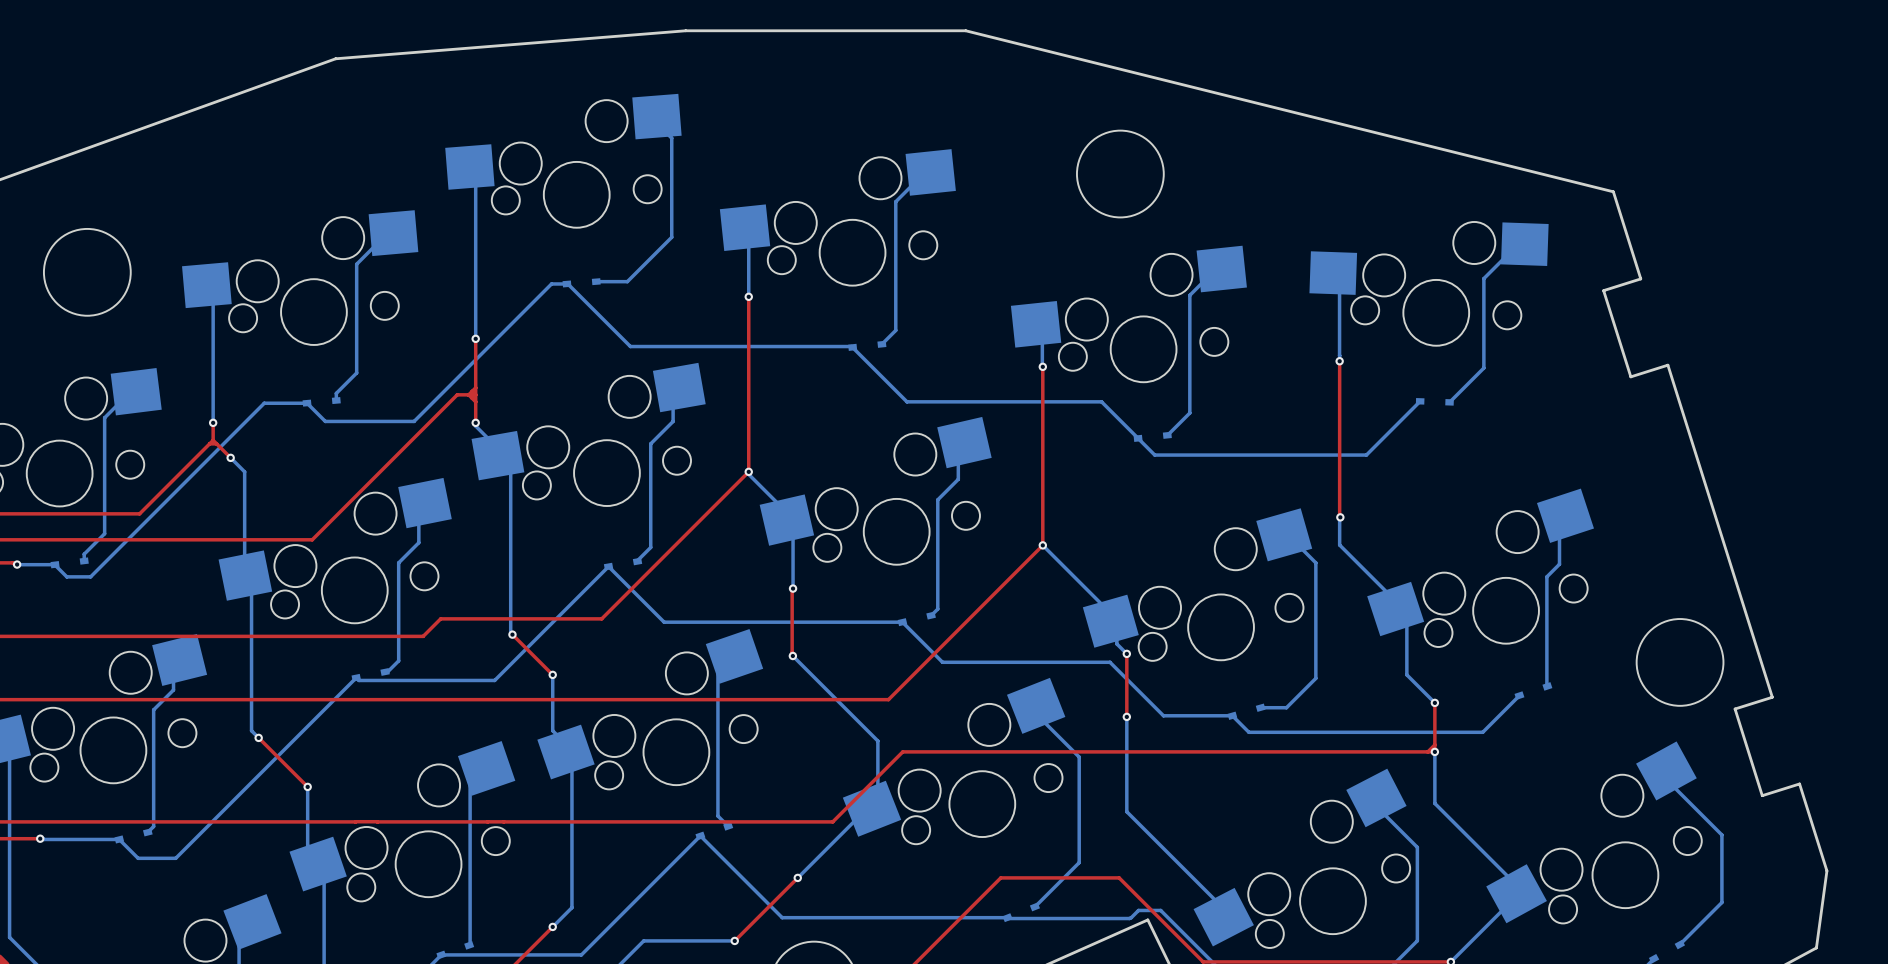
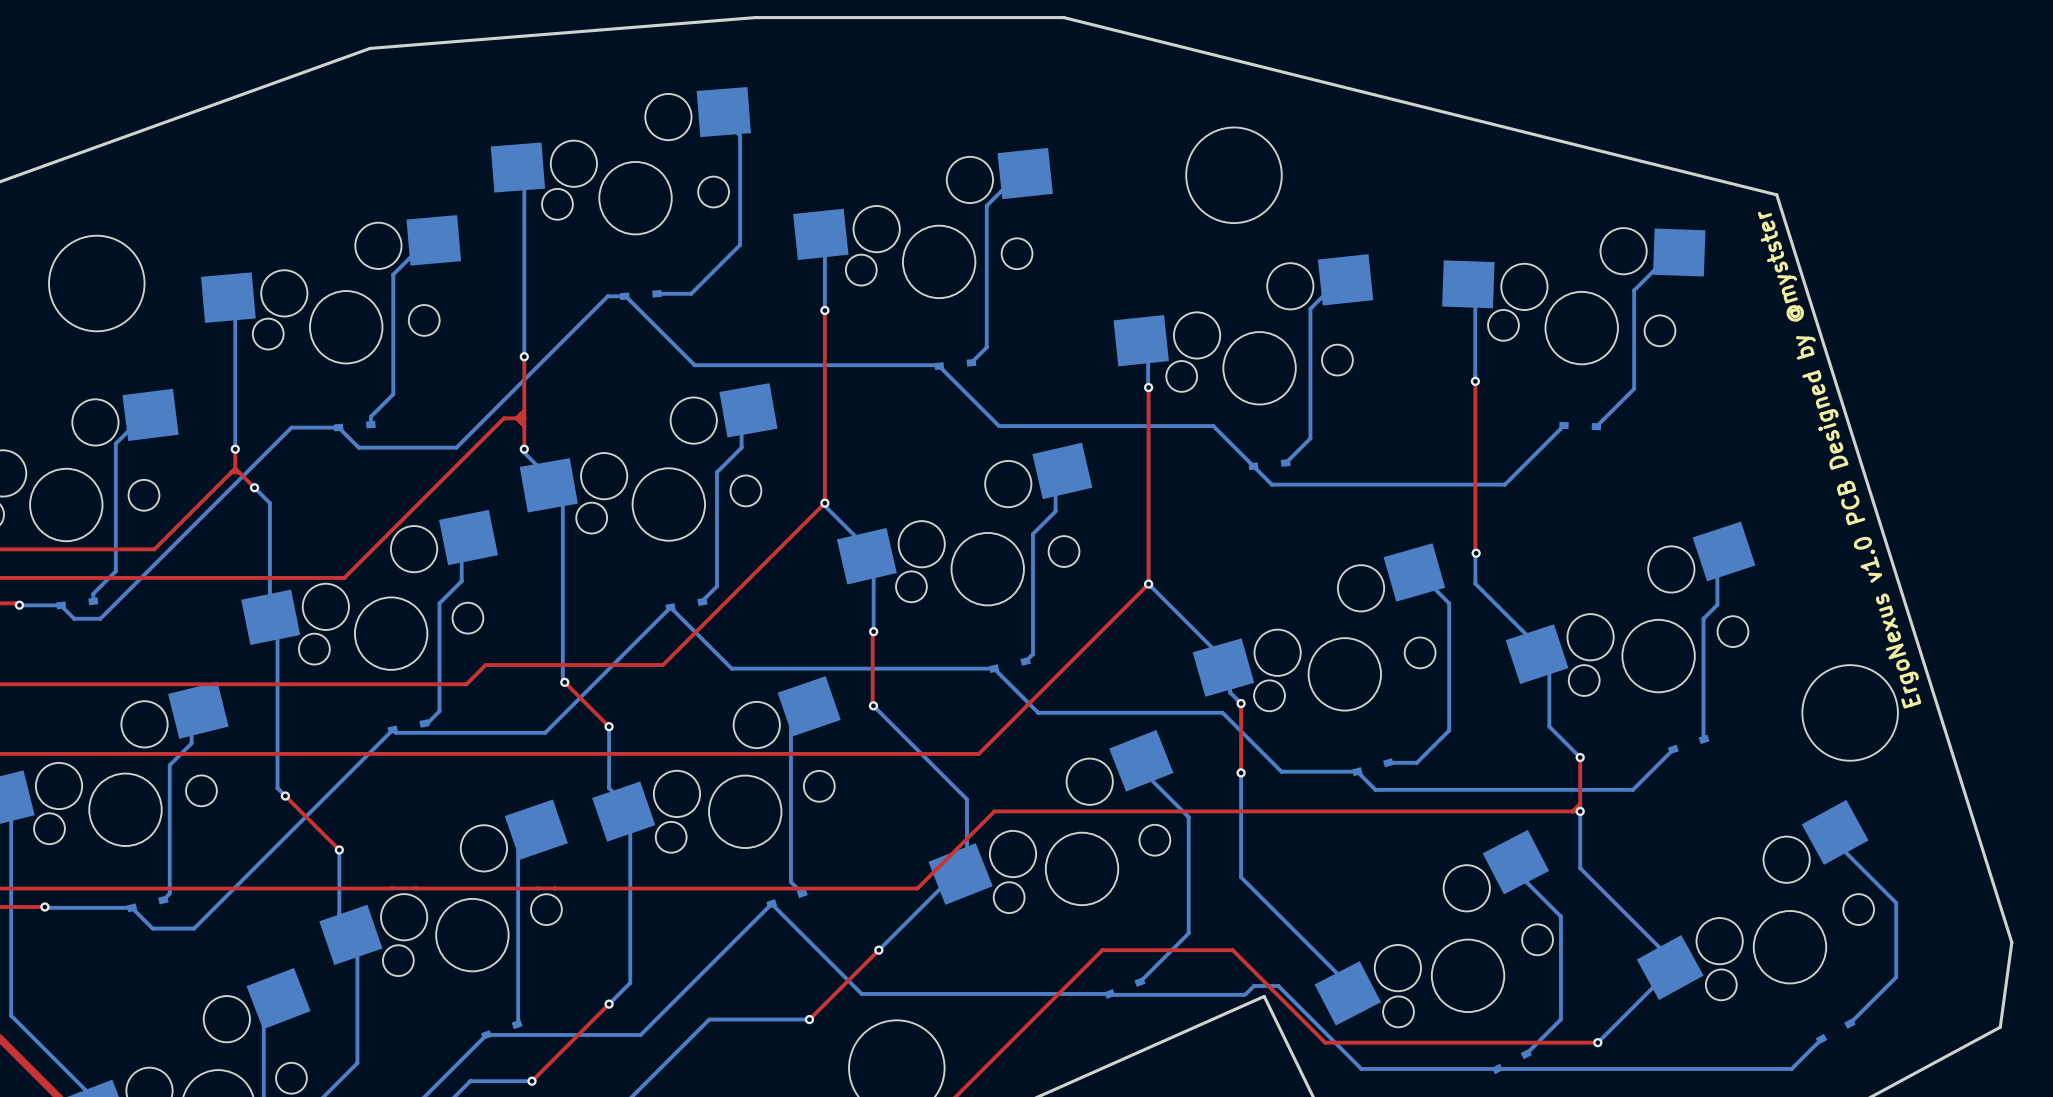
board edge: (1640, 278) (1603, 290) (1630, 376) (1667, 365) -> (1806, 290) (1836, 385)
text: none -> ErgoNexus v1.0 PCB Designed by @mystster (1839, 460)
board edge: (1772, 697) (1735, 708) (1762, 795) (1799, 783) -> (1951, 751) (1981, 846)

